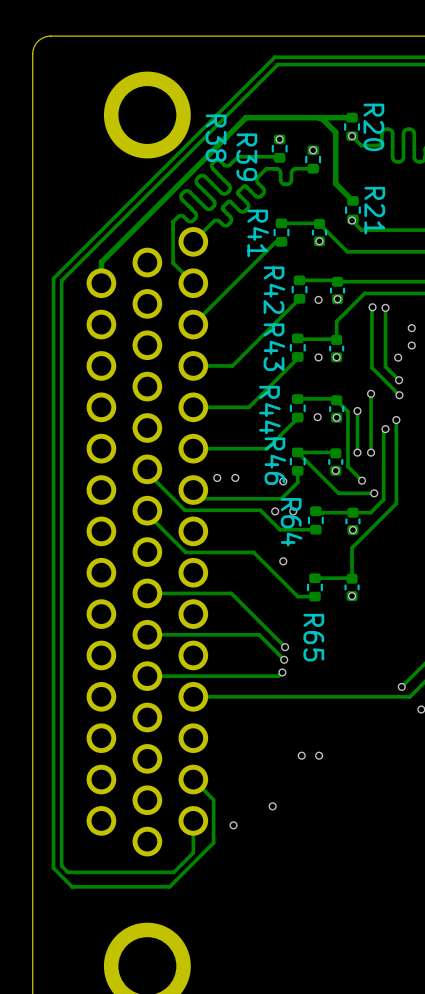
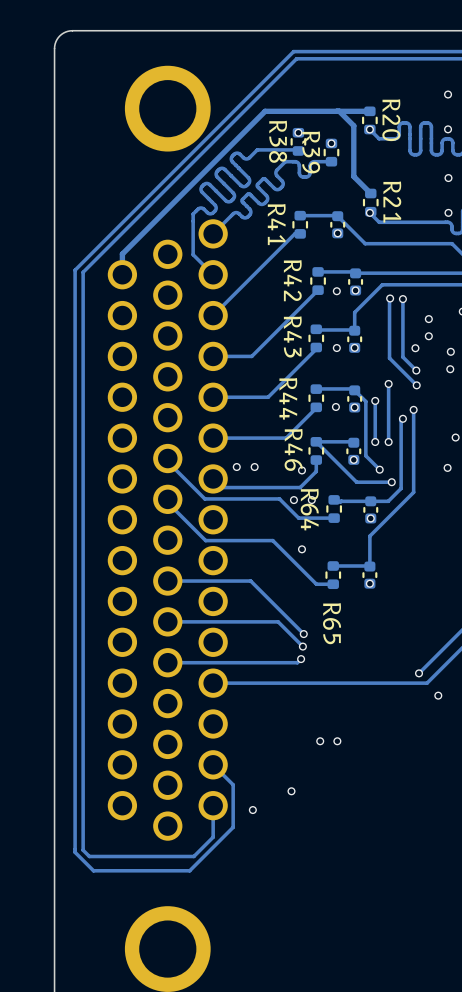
R38 name position: R38 (216, 138) -> R38 (278, 141)
R39 name position: R39 (246, 157) -> R39 (311, 152)

